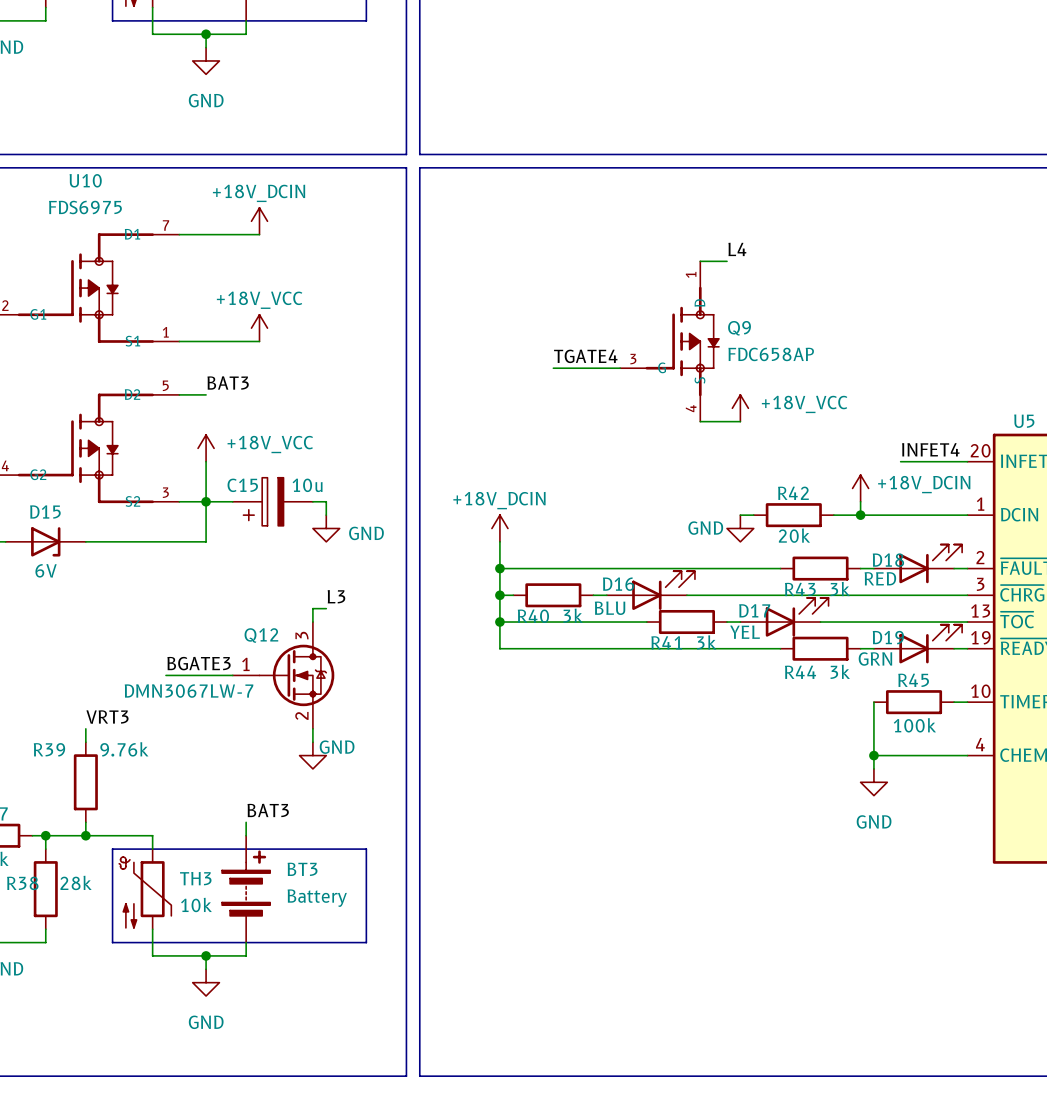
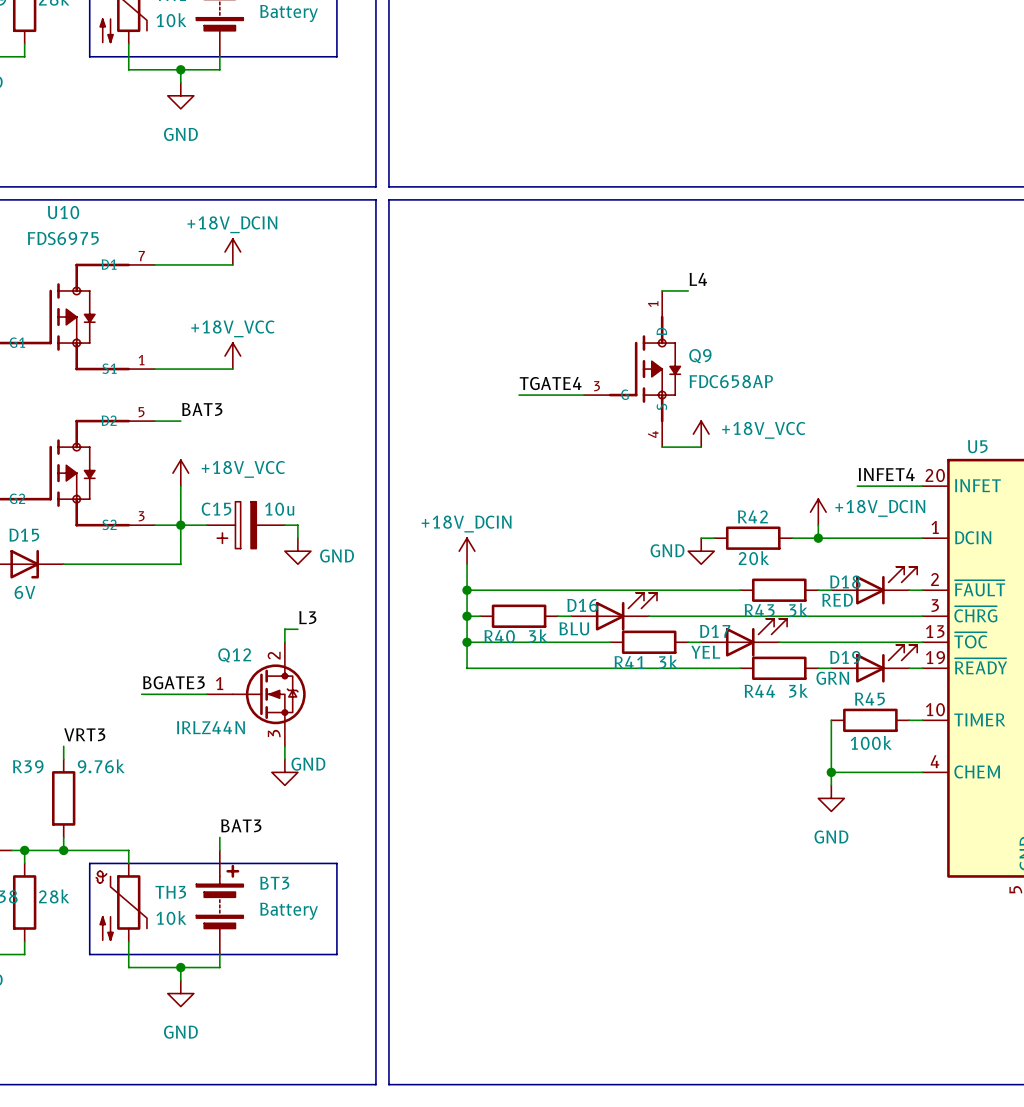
Q12 pin number: 3 (301, 635) -> 2 (274, 655)
Q12 value: DMN3067LW-7 (189, 691) -> IRLZ44N (210, 727)
Q12 pin number: 2 (301, 715) -> 3 (274, 733)

